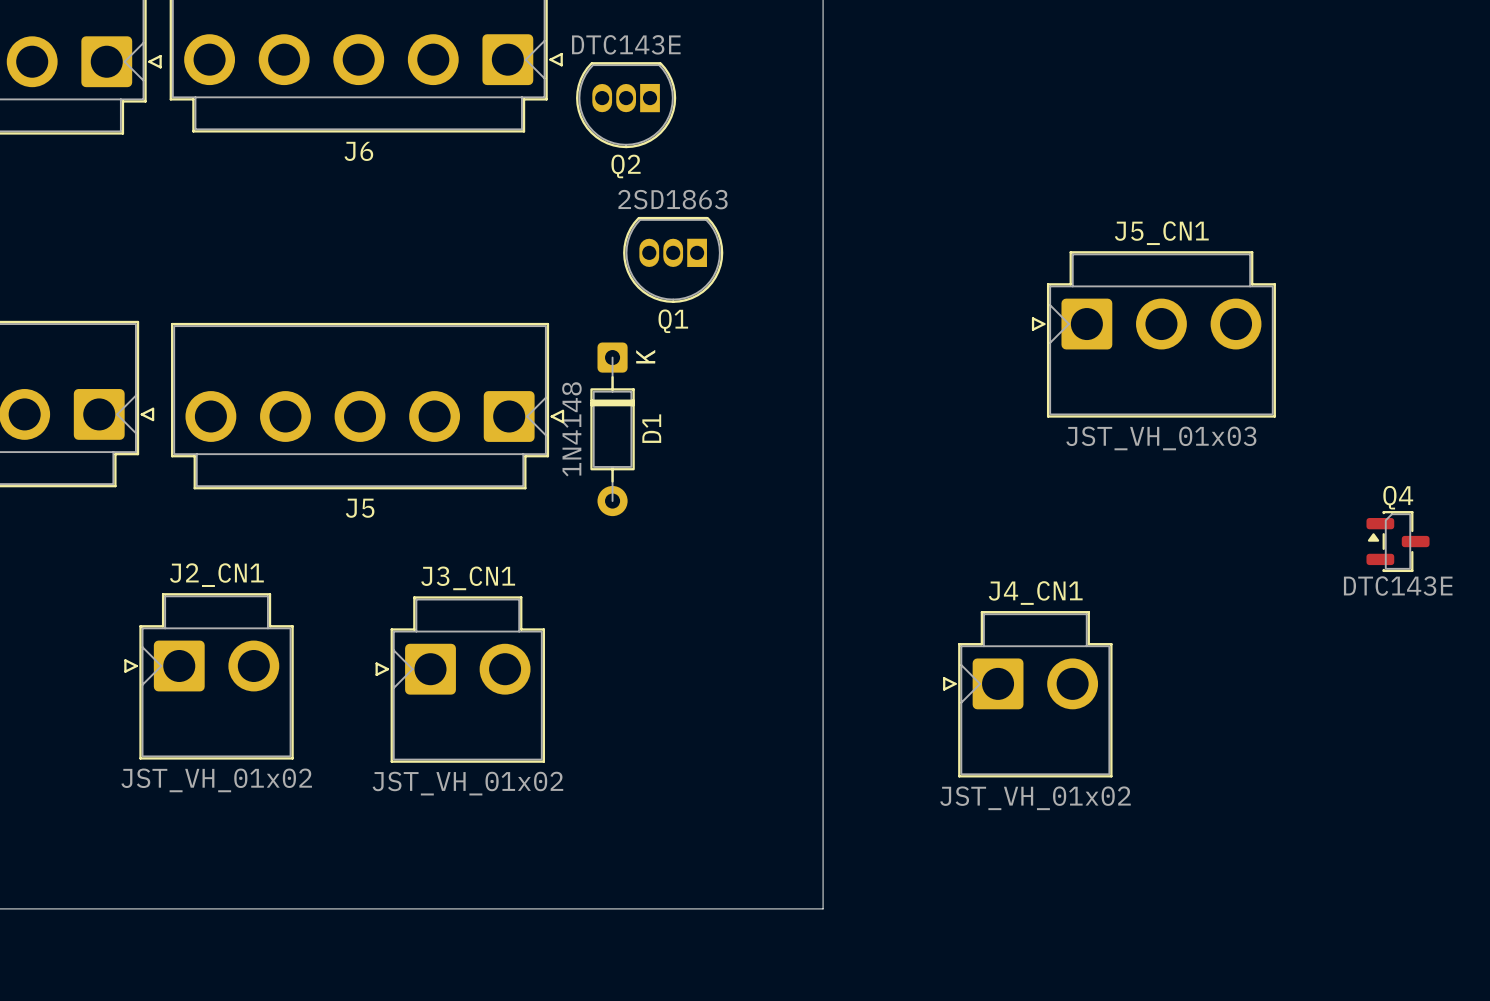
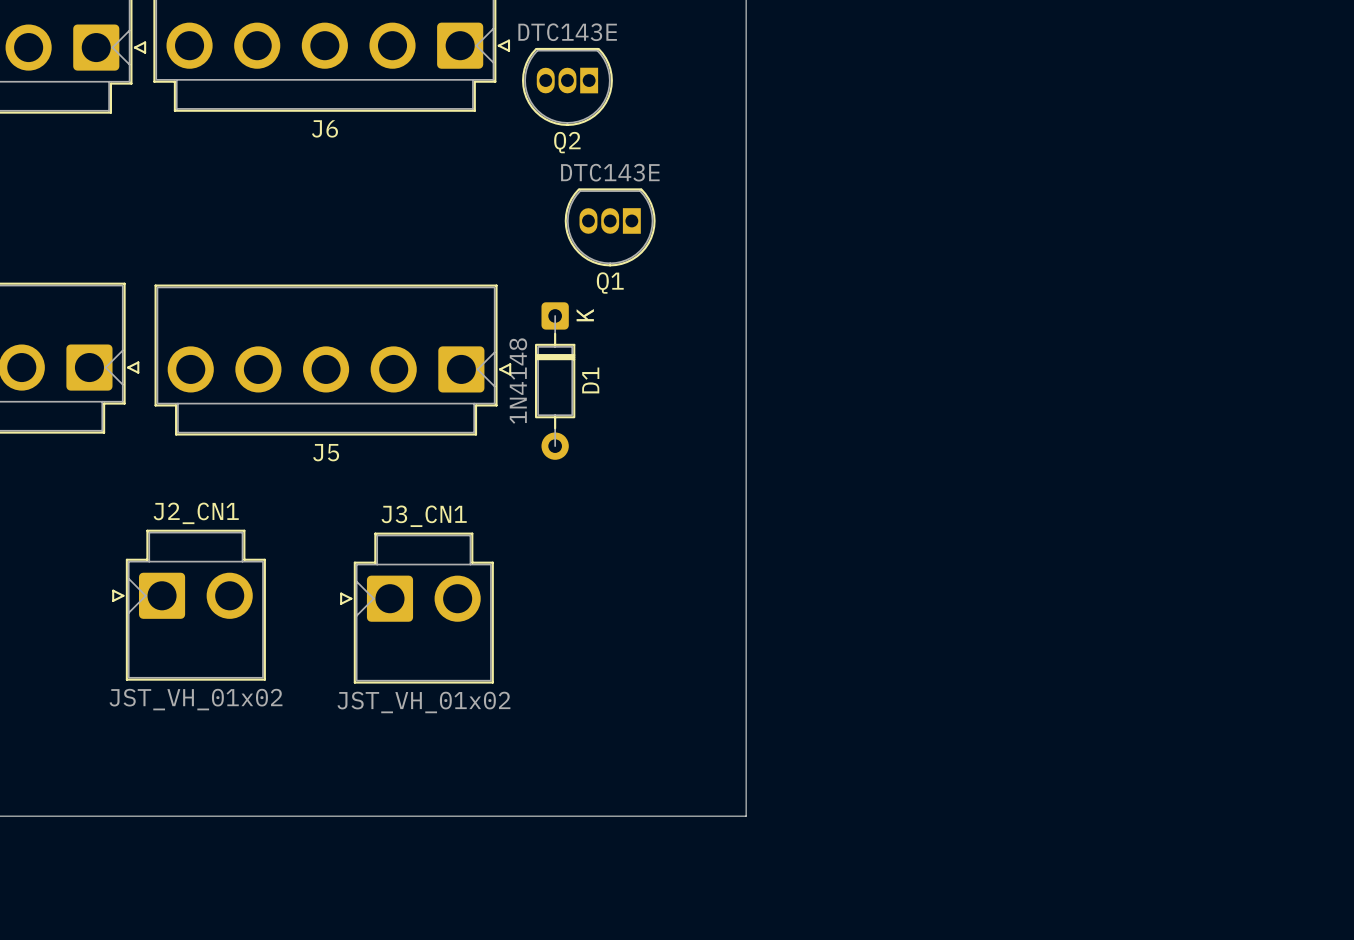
Q1 value: 2SD1863 (672, 199) -> DTC143E (610, 172)
J5_CN1: JST_VH_01x03 (1153, 334) -> none
Q4: DTC143E (1398, 541) -> none
J4_CN1: JST_VH_01x02 (1027, 694) -> none

